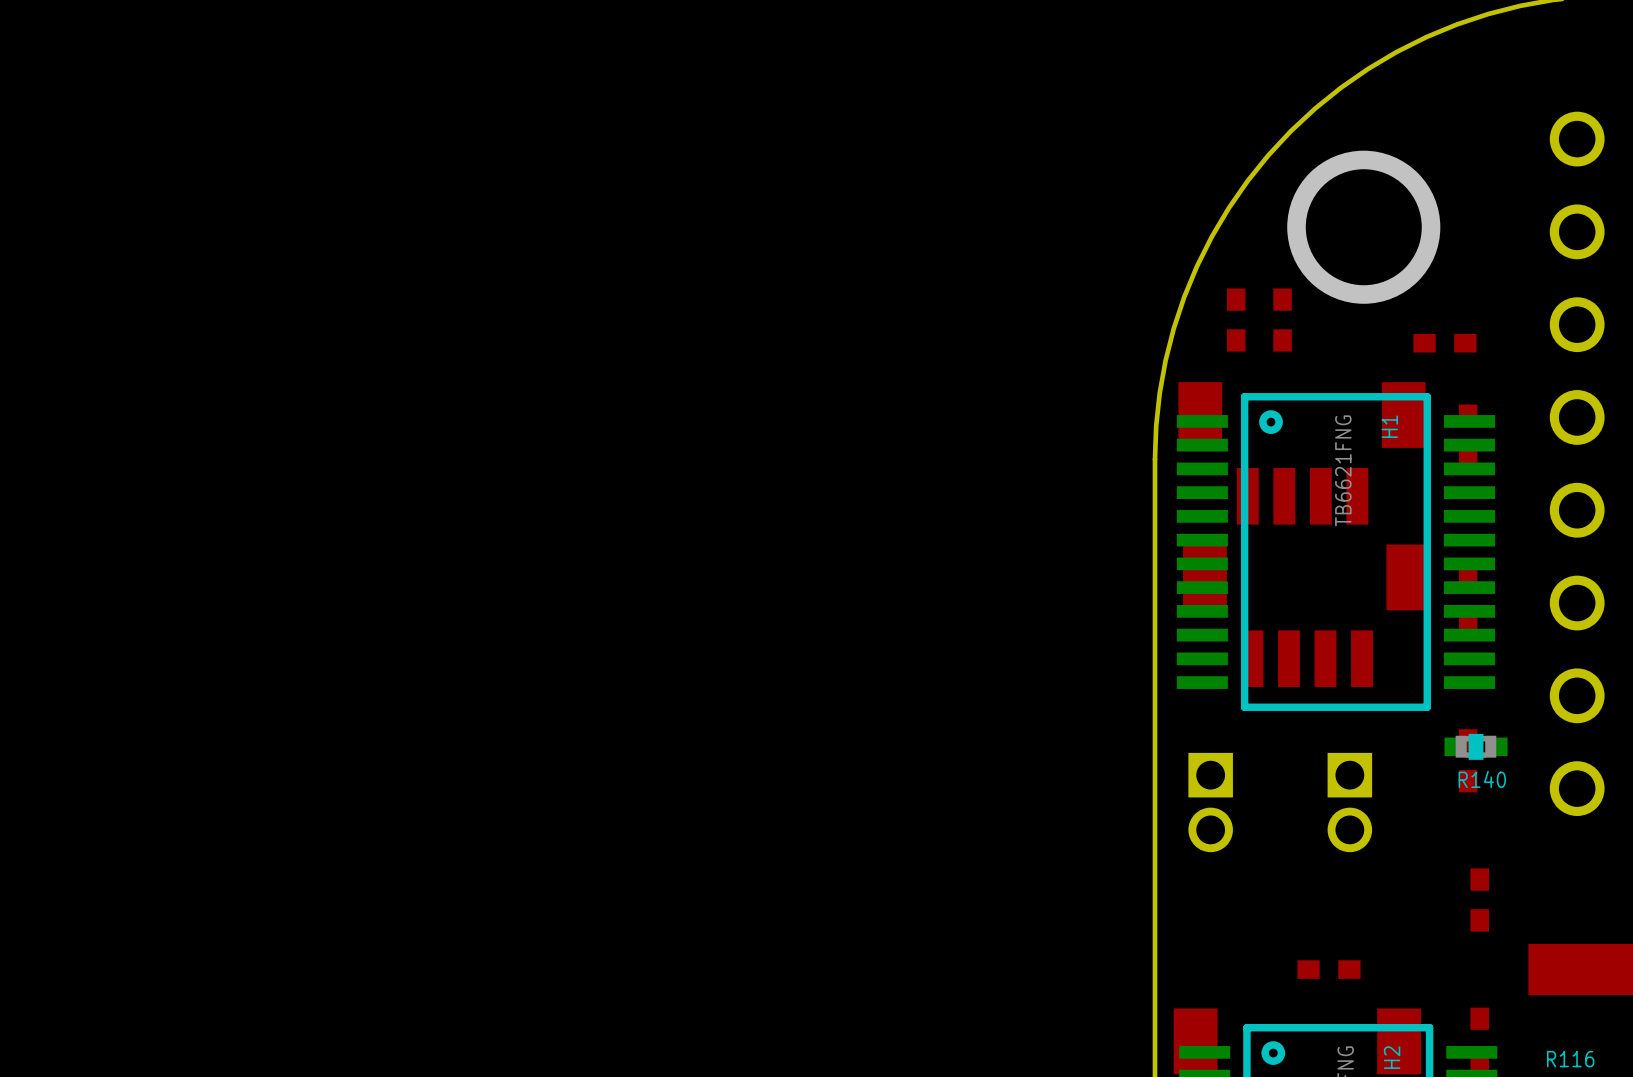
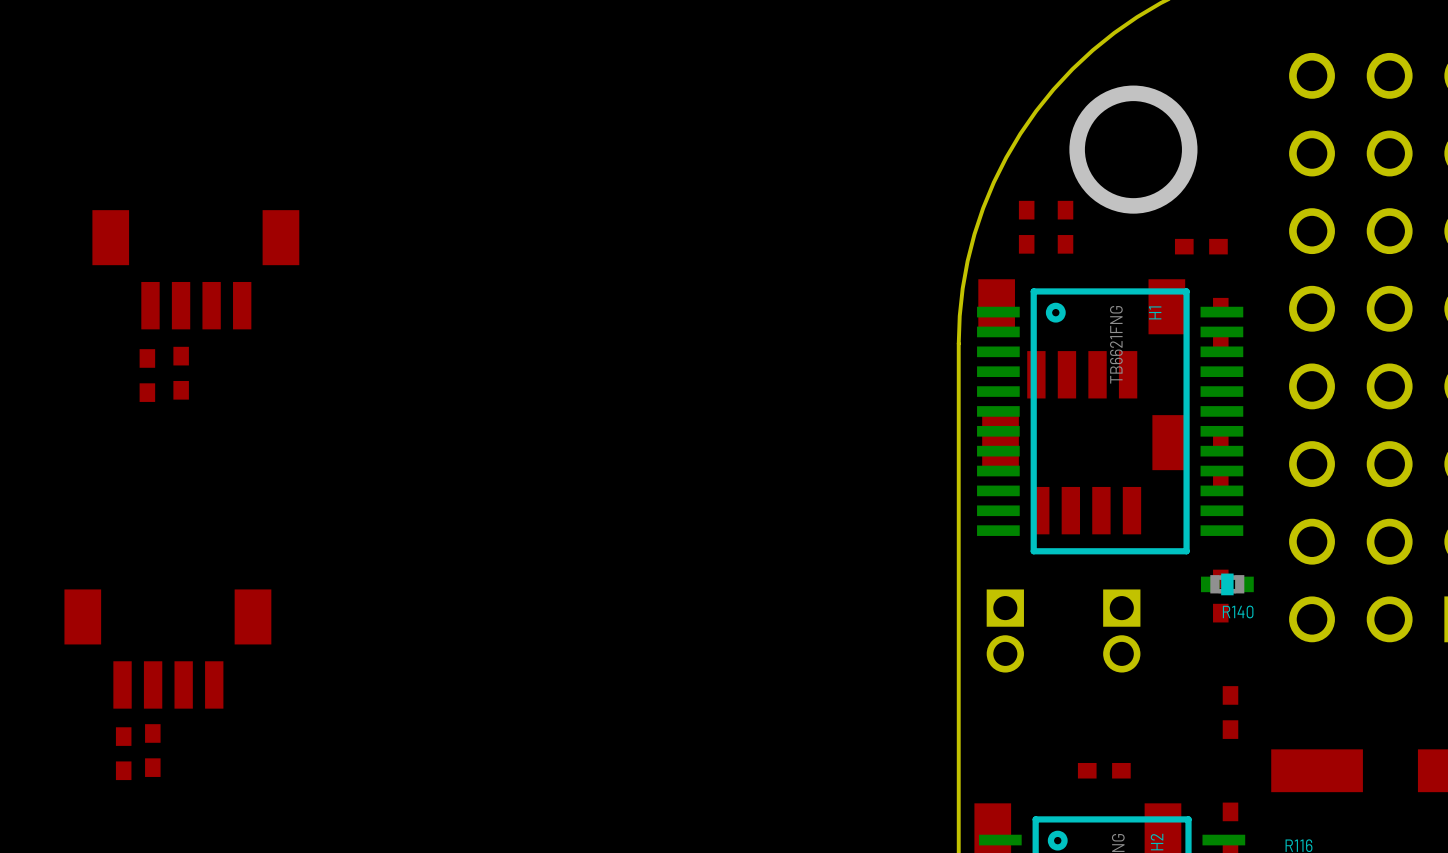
part: none -> (195, 269)
part: none -> (181, 373)
part: none -> (147, 375)
part: none -> (167, 649)
part: none -> (152, 750)
part: none -> (123, 753)

